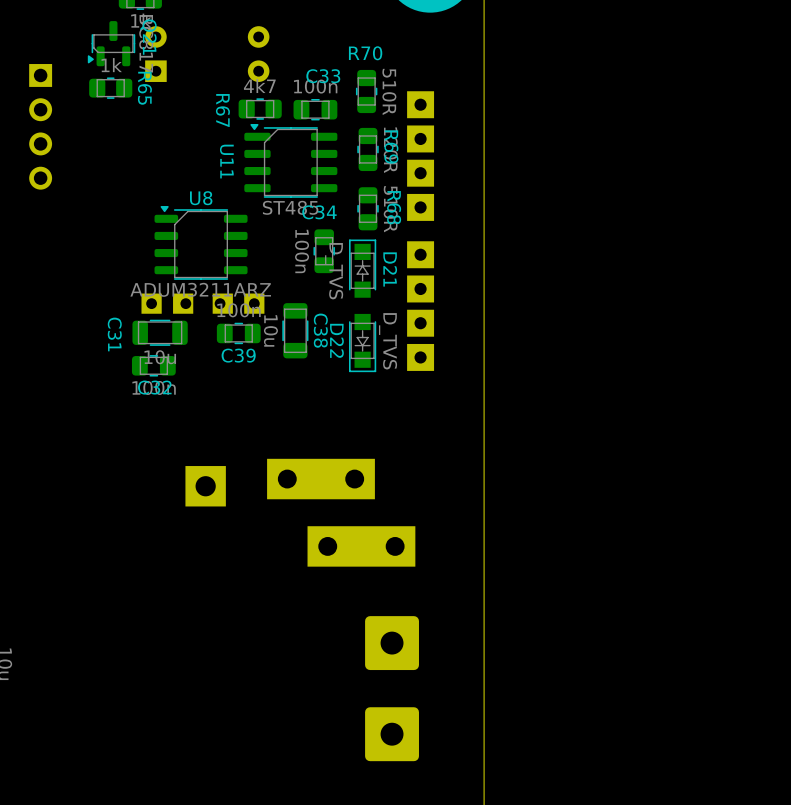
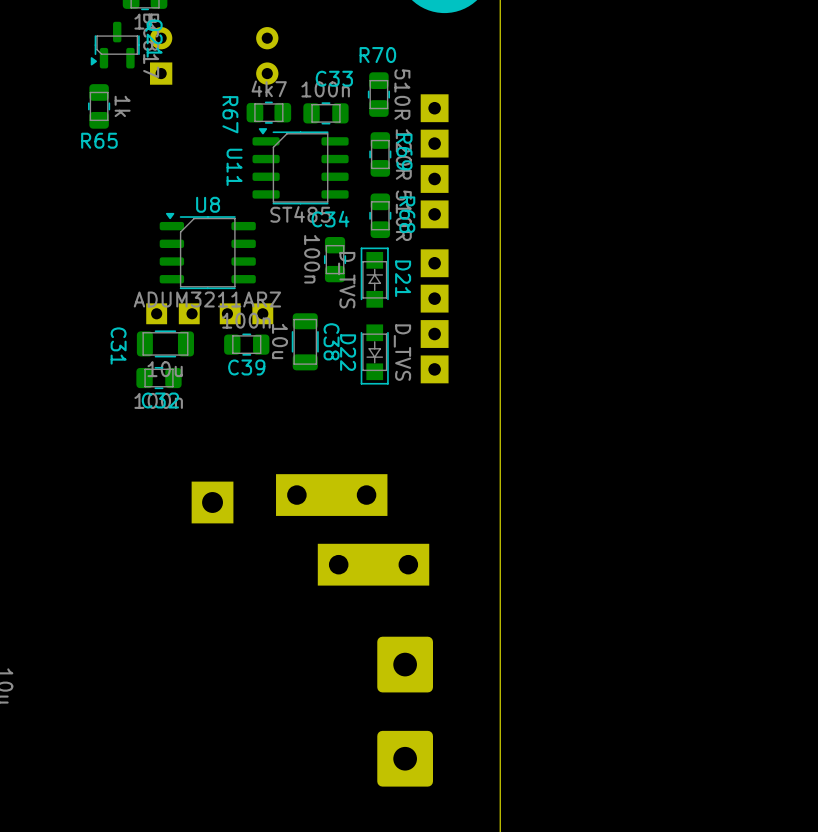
R65 rotation: 0° (110, 88) -> 90° clockwise (99, 106)
part: (40, 126) -> none

